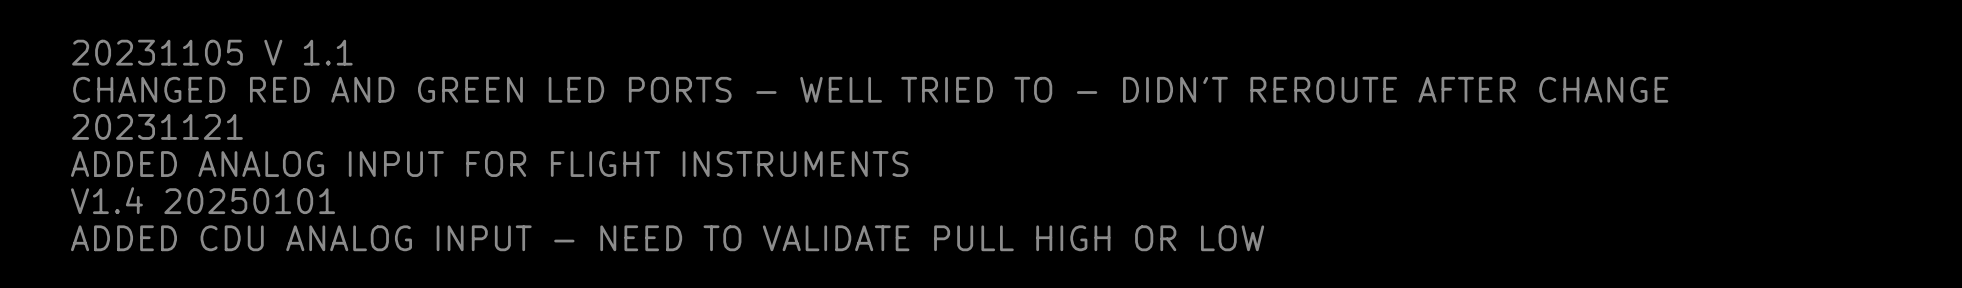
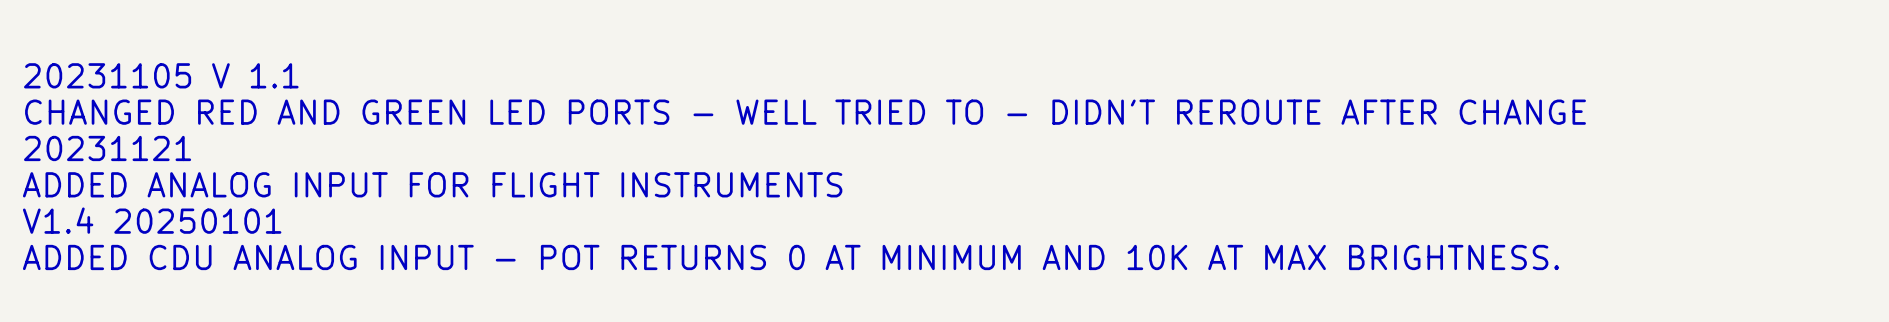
text: ADDED CDU ANALOG INPUT - NEED TO VALIDATE PULL HIGH OR LOW (667, 238) -> ADDED CDU ANALOG INPUT - POT RETURNS 0 AT MINIMUM AND 10K AT MAX BRIGHTNESS. (791, 257)

